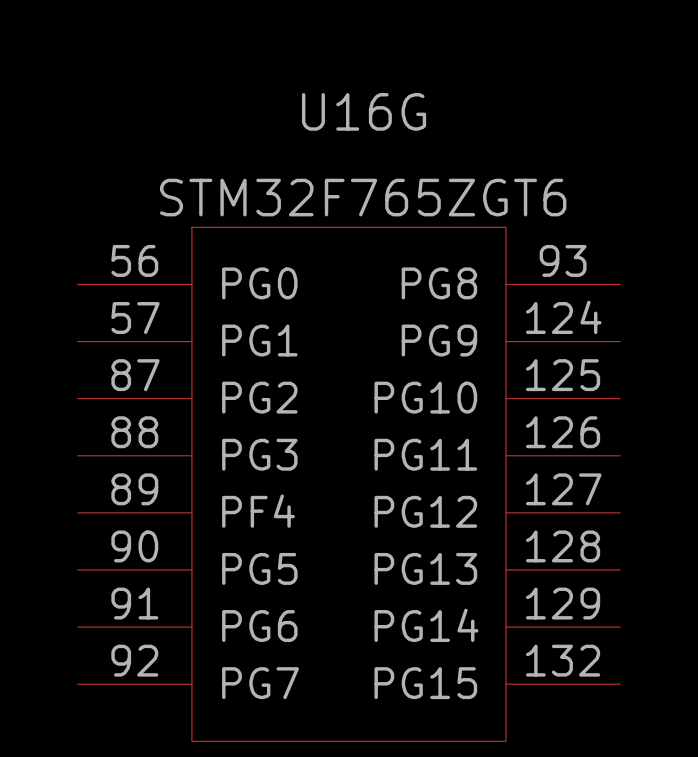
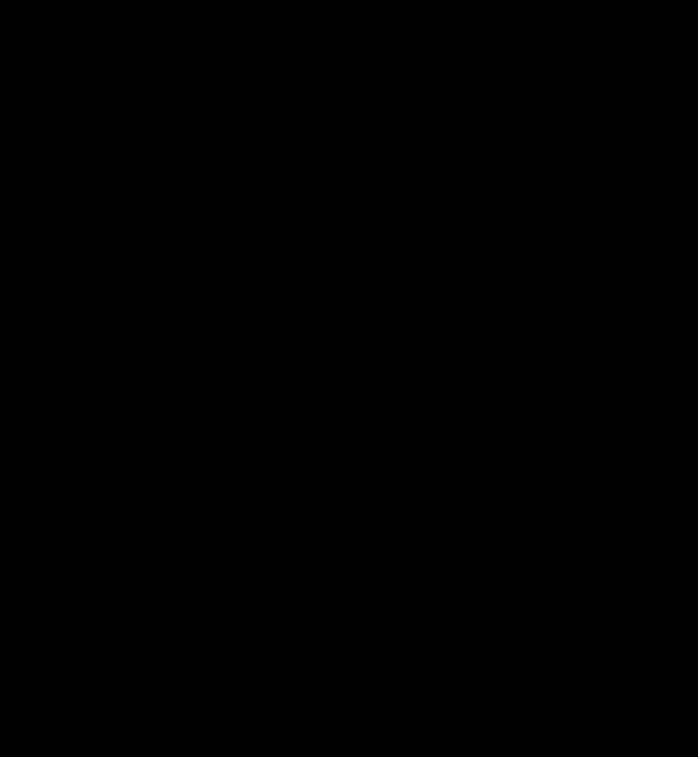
U16G: STM32F765ZGT6 (348, 484) -> none

